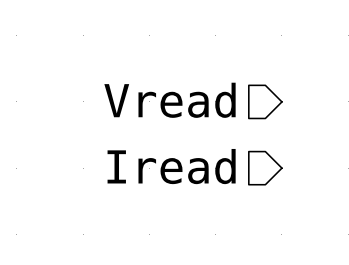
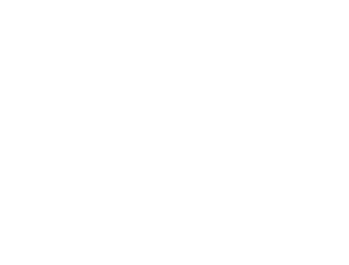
hierarchical label: Vread (170, 100) -> none
hierarchical label: Iread (171, 166) -> none

